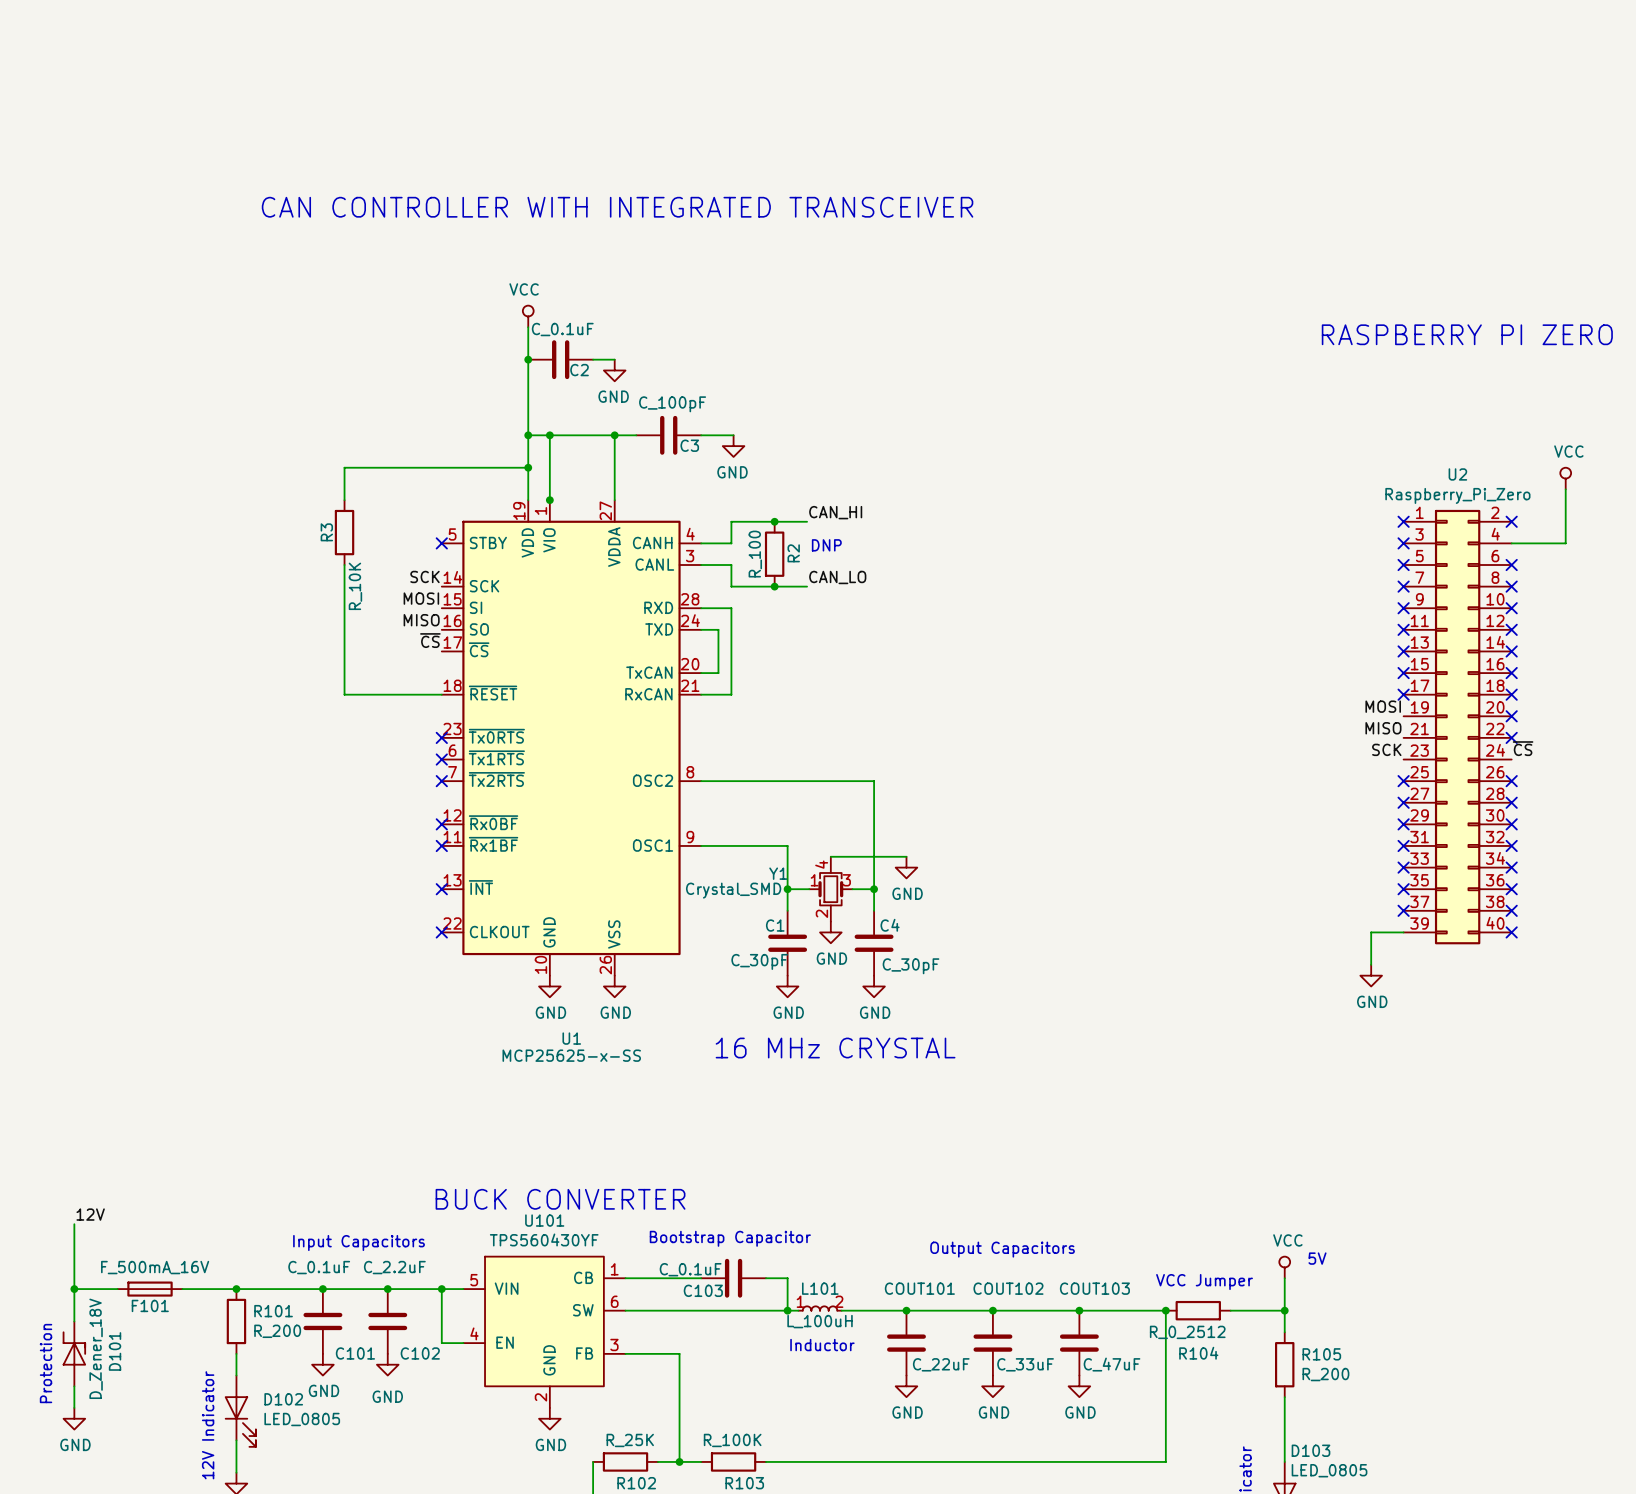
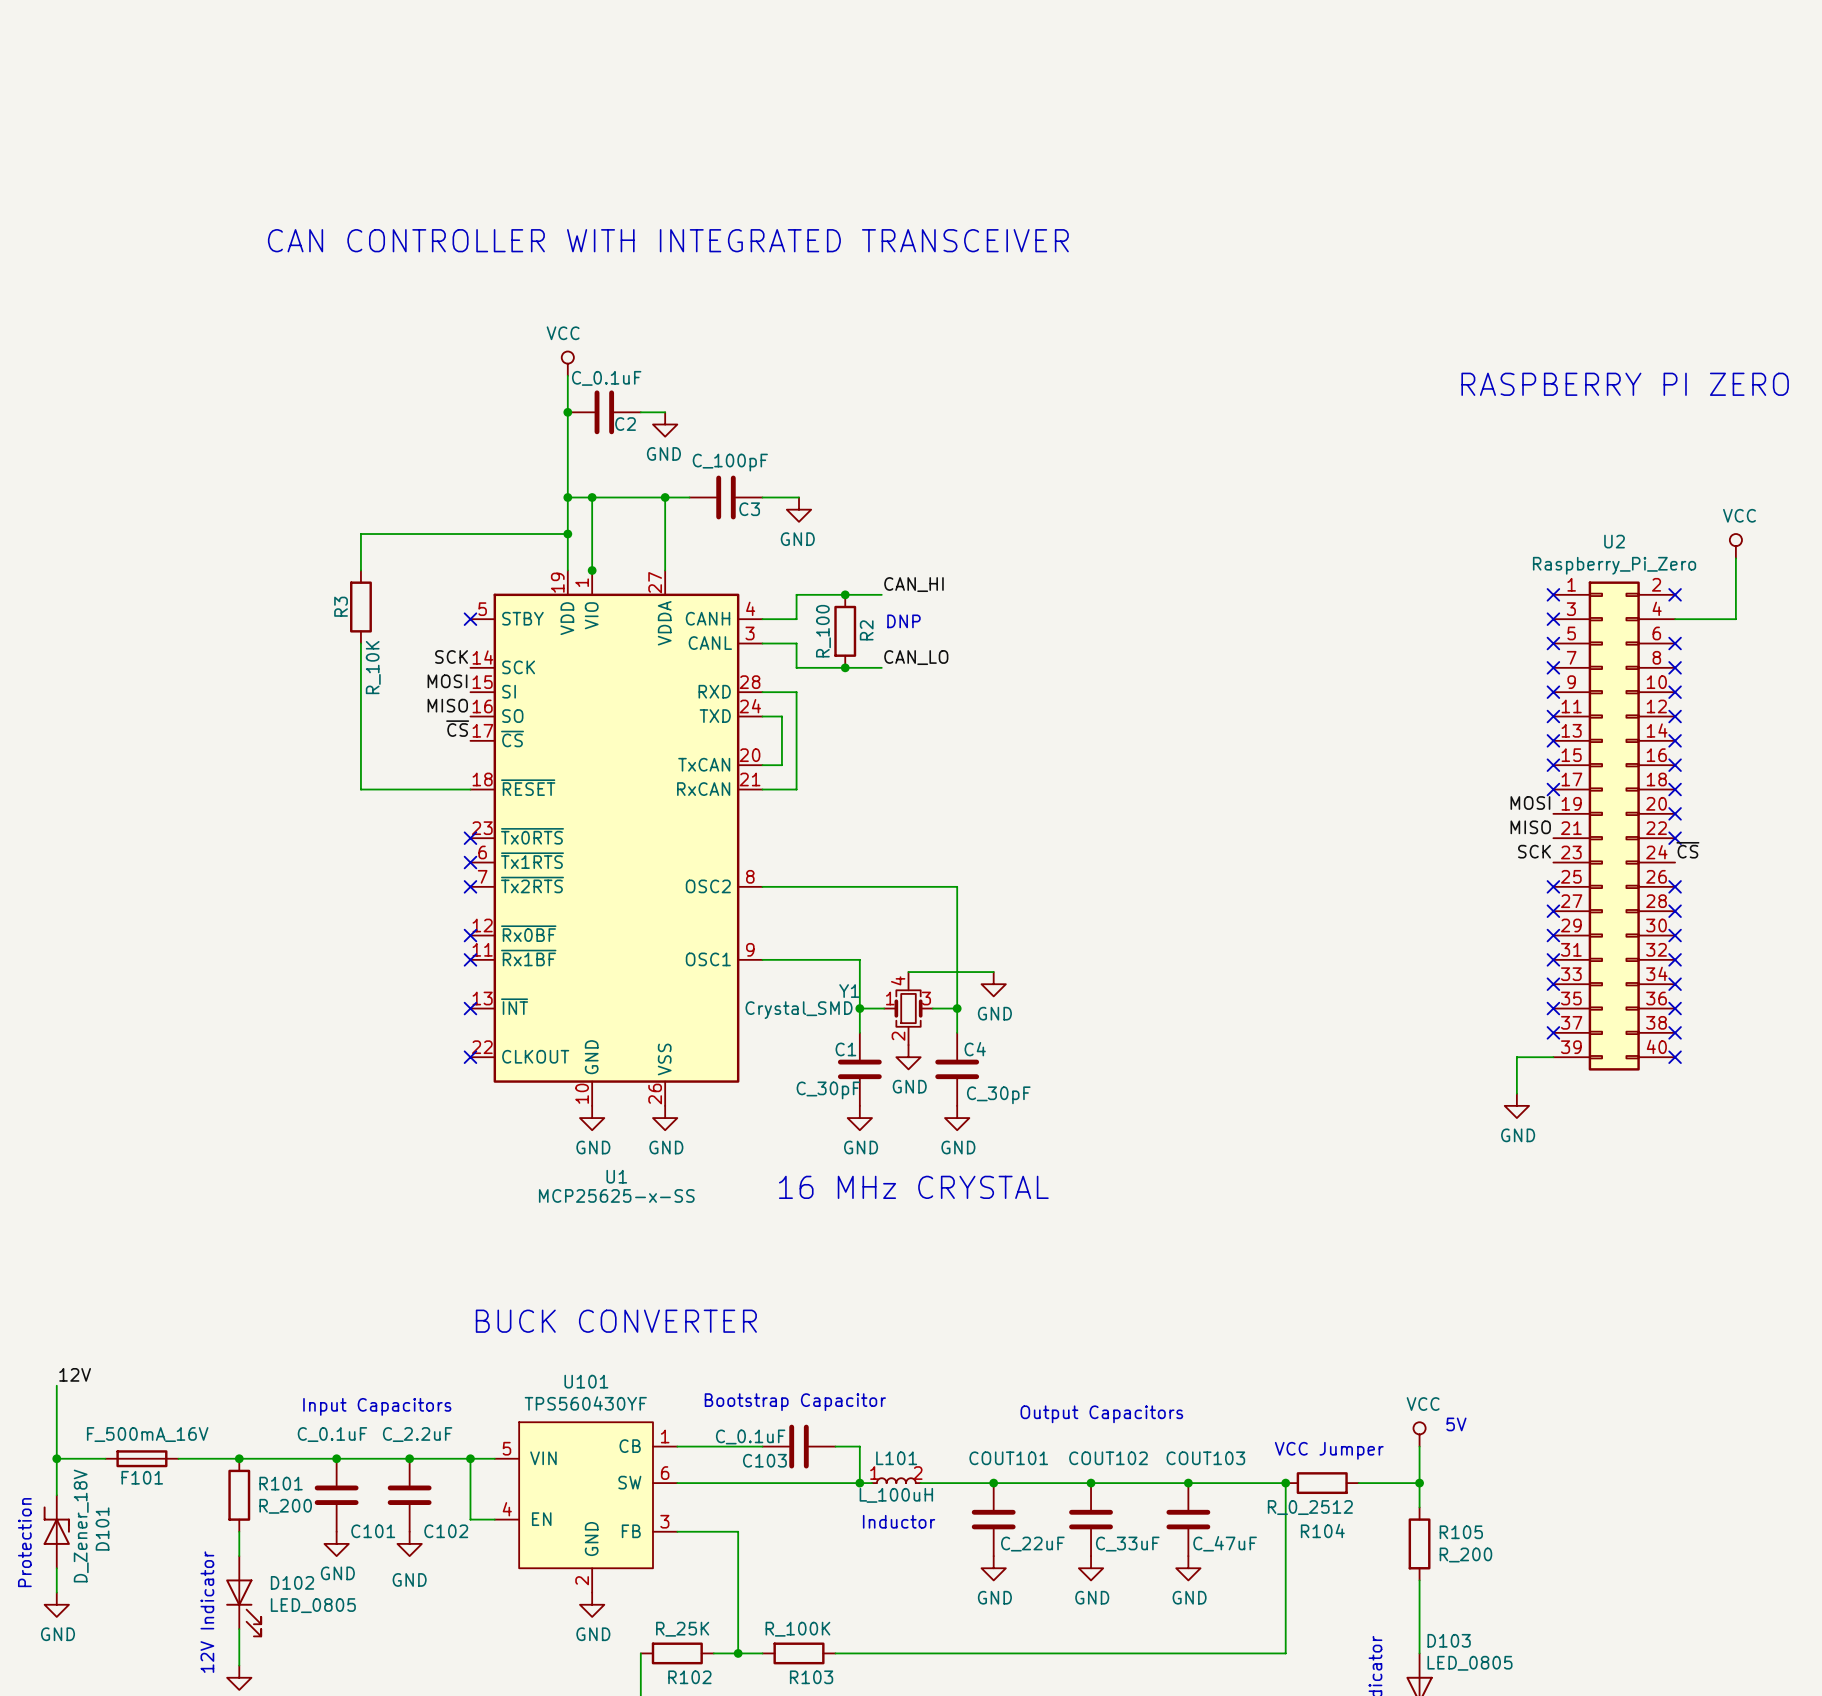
text position: BUCK CONVERTER (560, 1199) -> BUCK CONVERTER (616, 1321)

